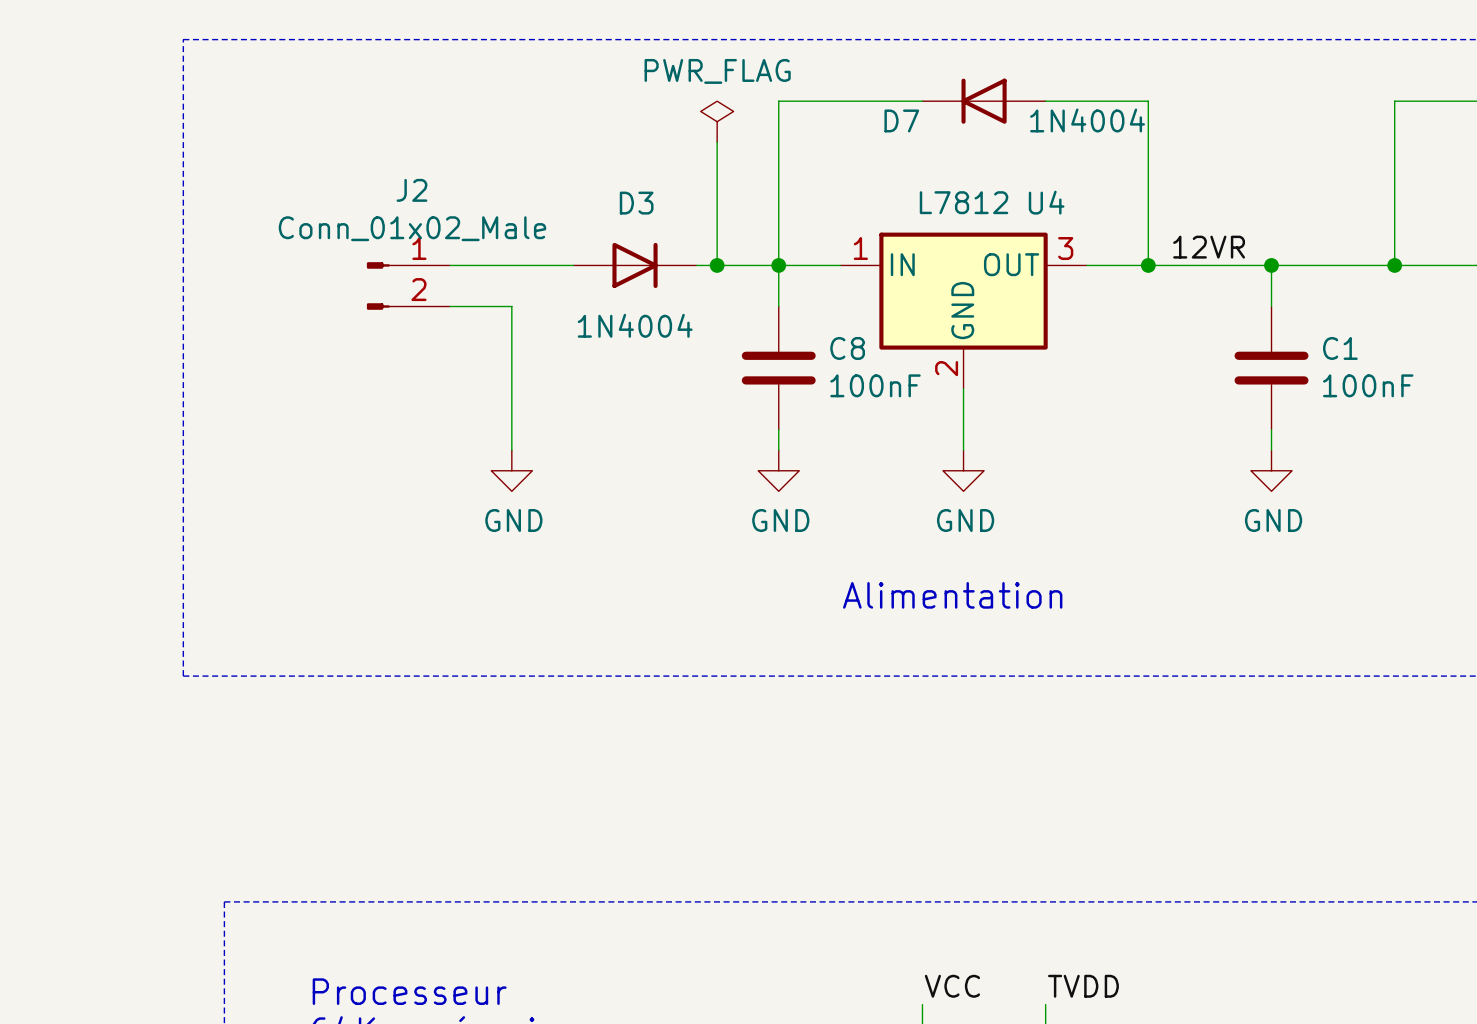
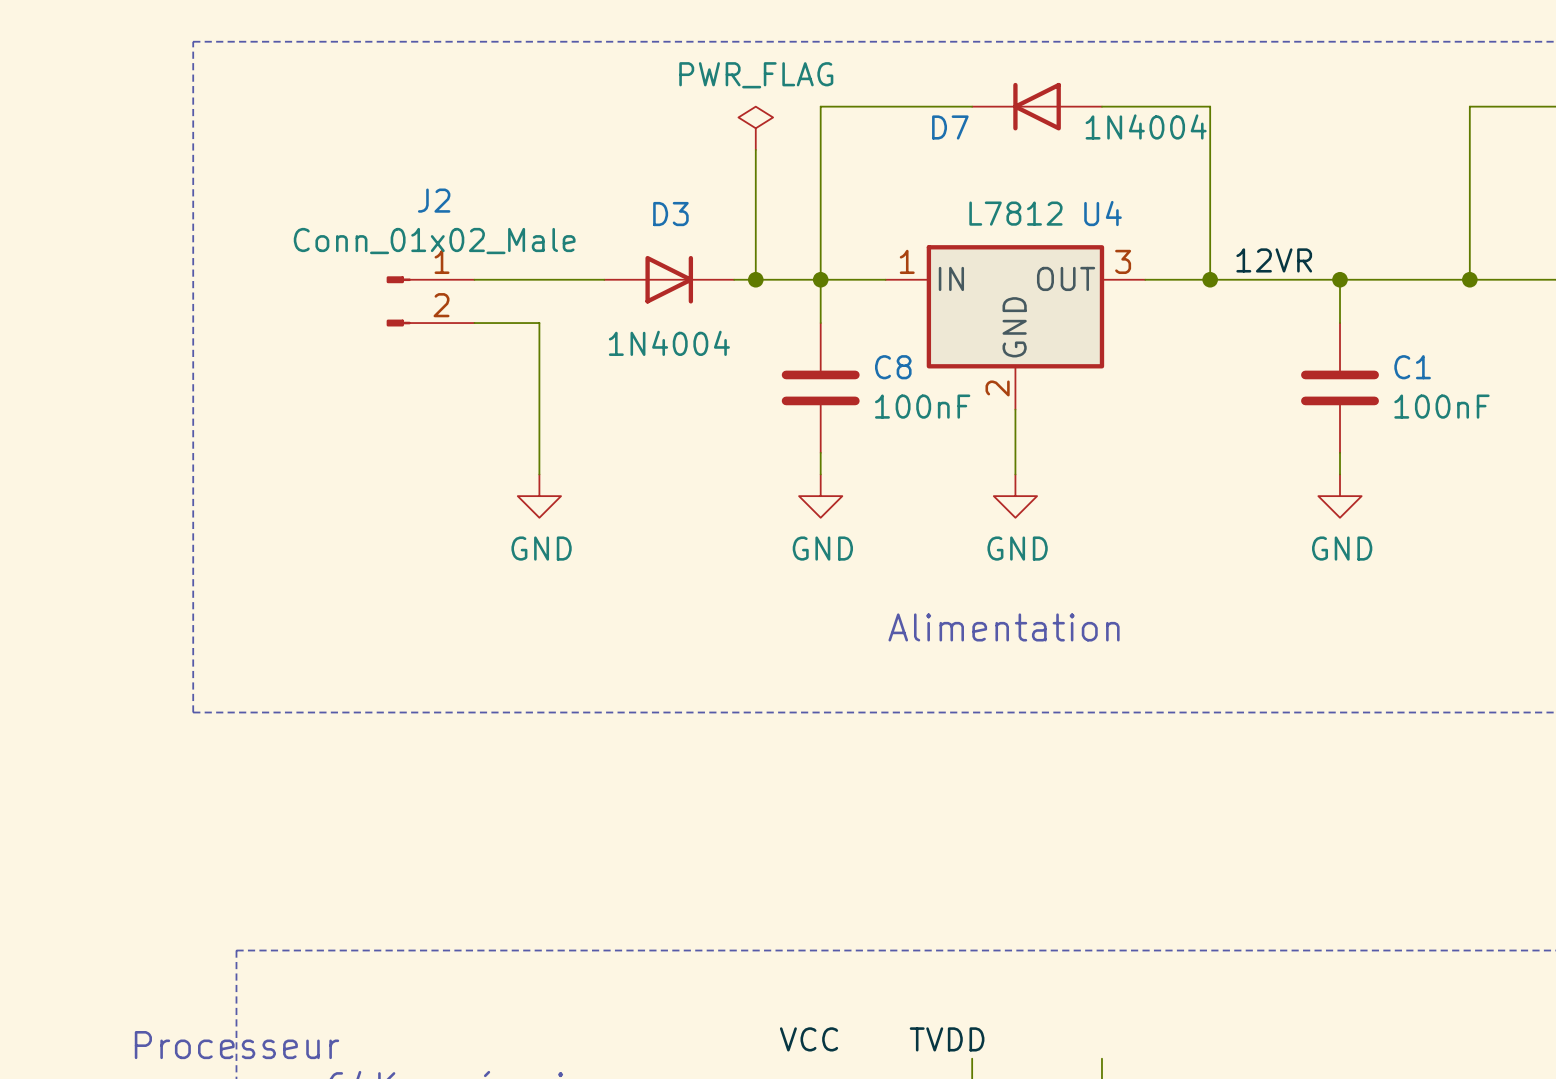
label position: VCC (952, 986) -> VCC (809, 1039)
label position: TVDD (1083, 986) -> TVDD (947, 1039)
text position: Processeur (409, 991) -> Processeur (236, 1045)

